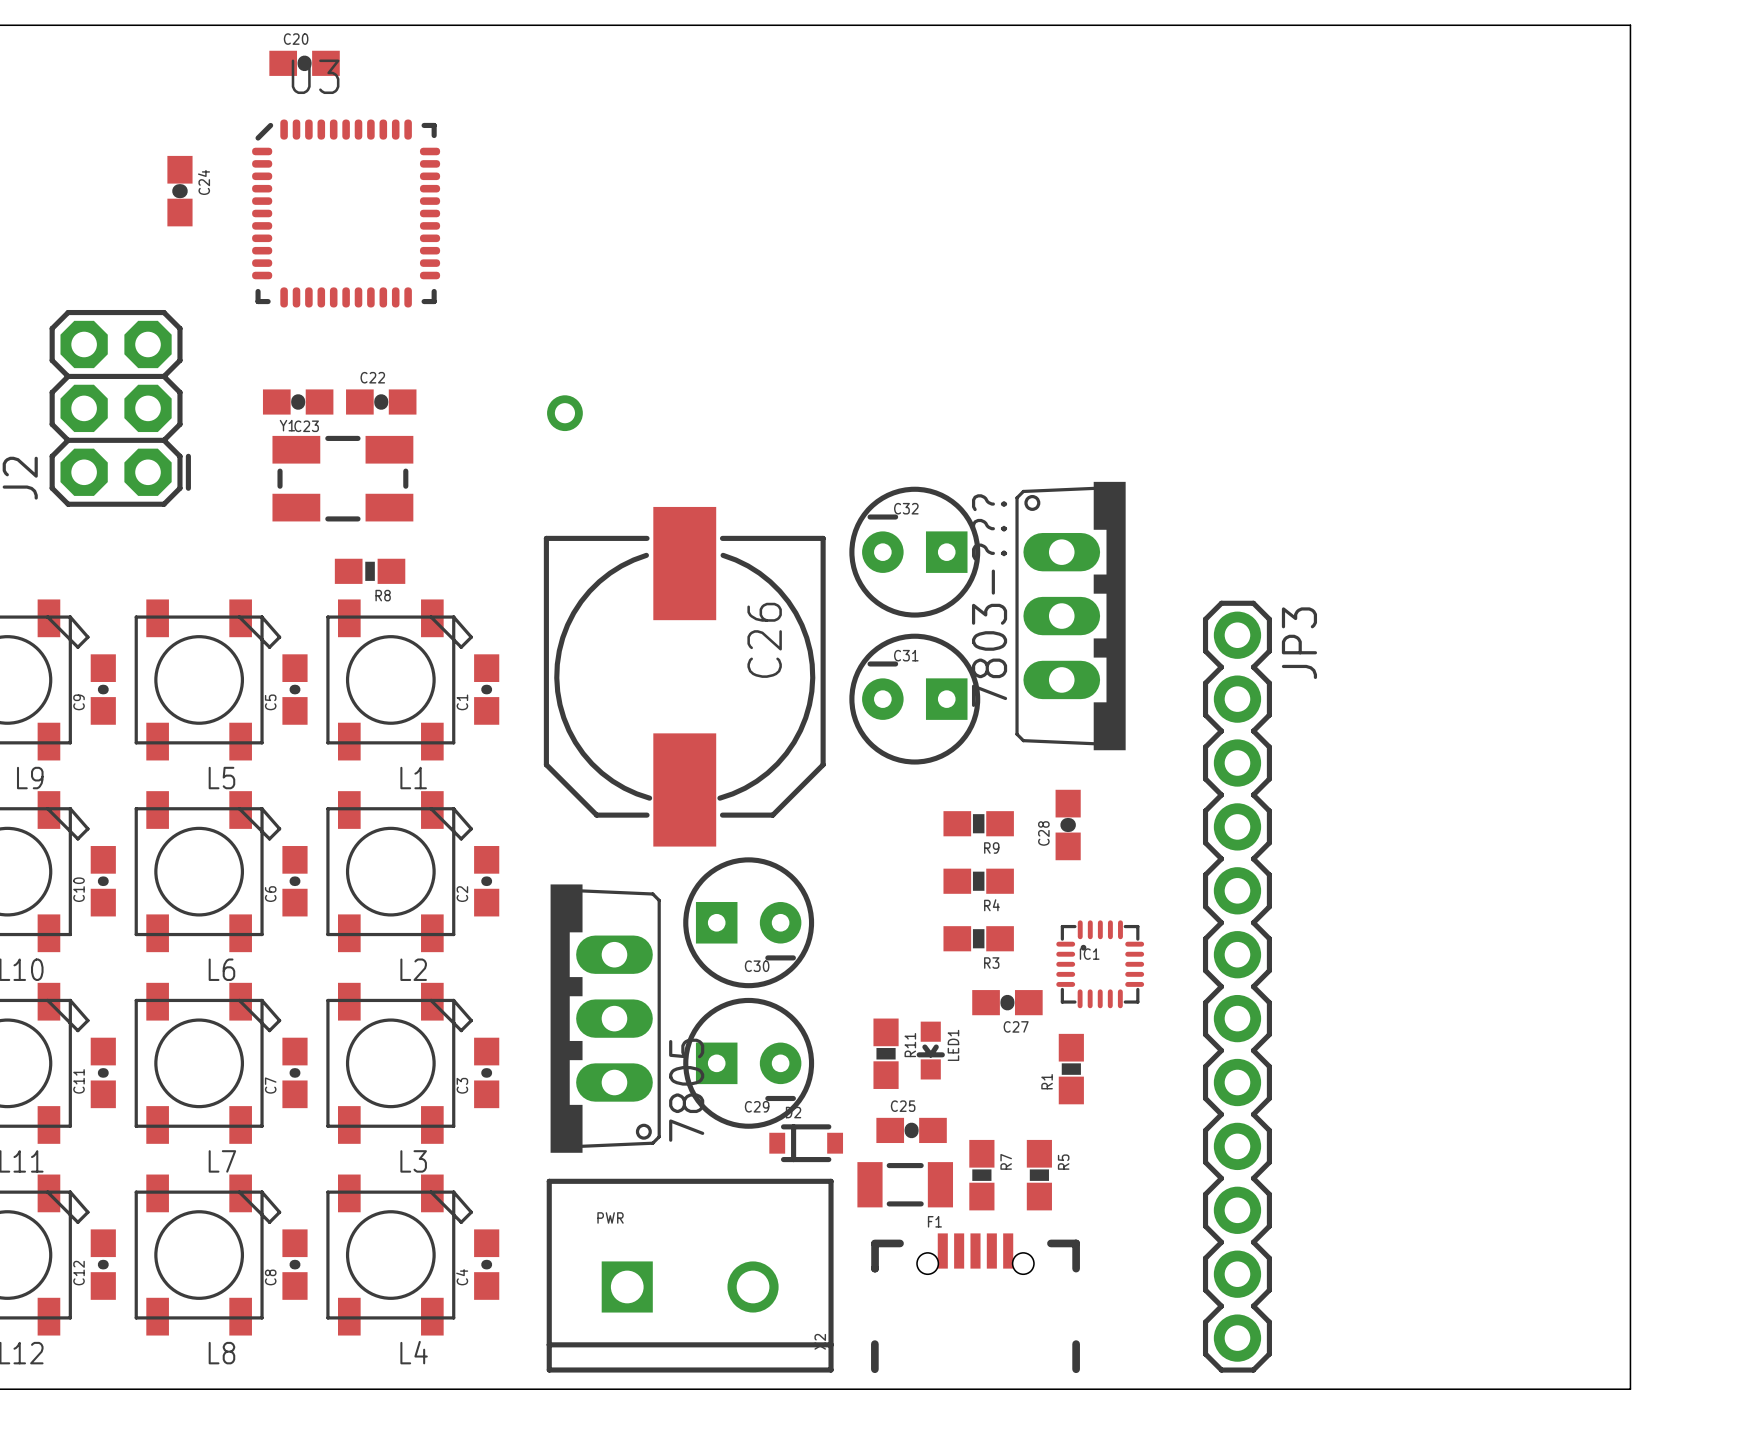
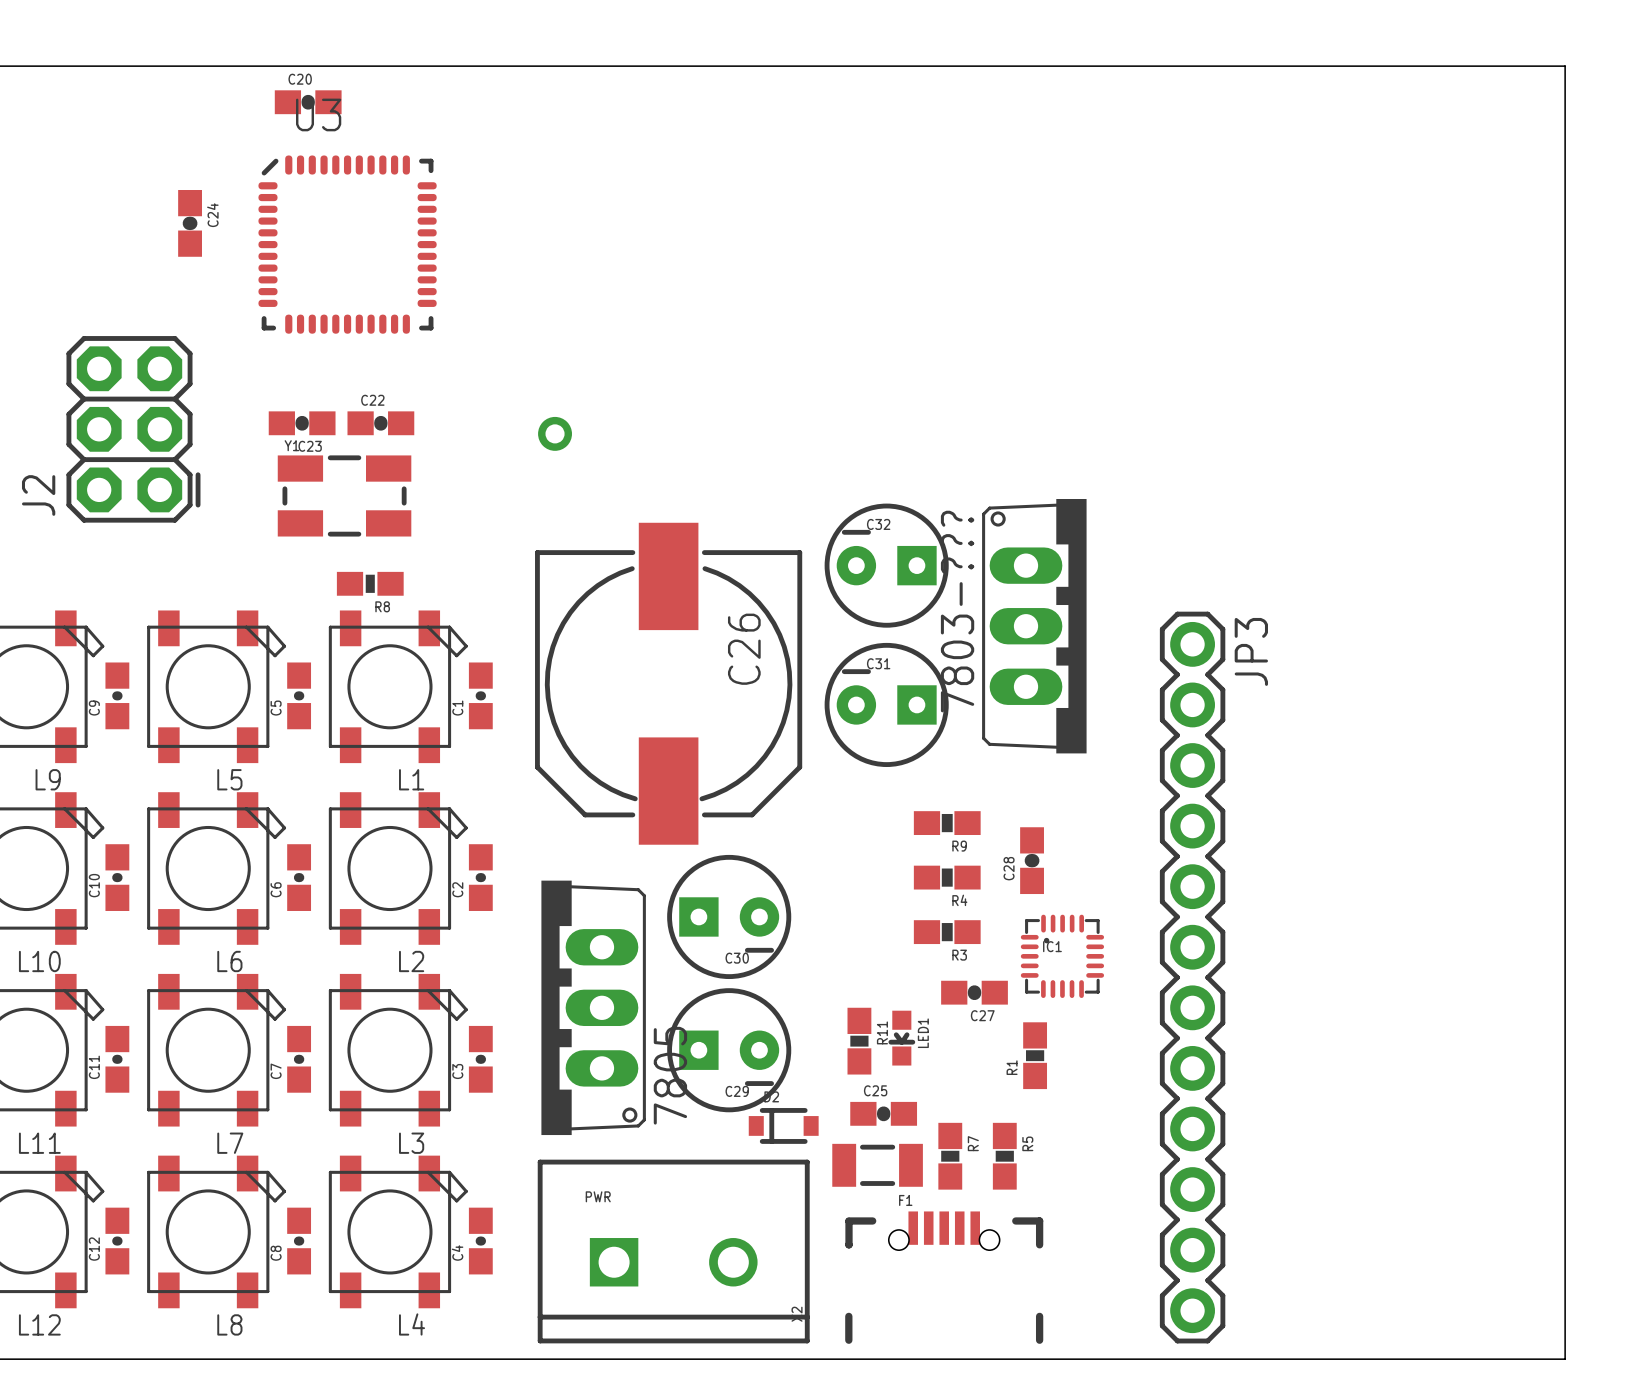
C28 position: (1068, 825) -> (1032, 860)

